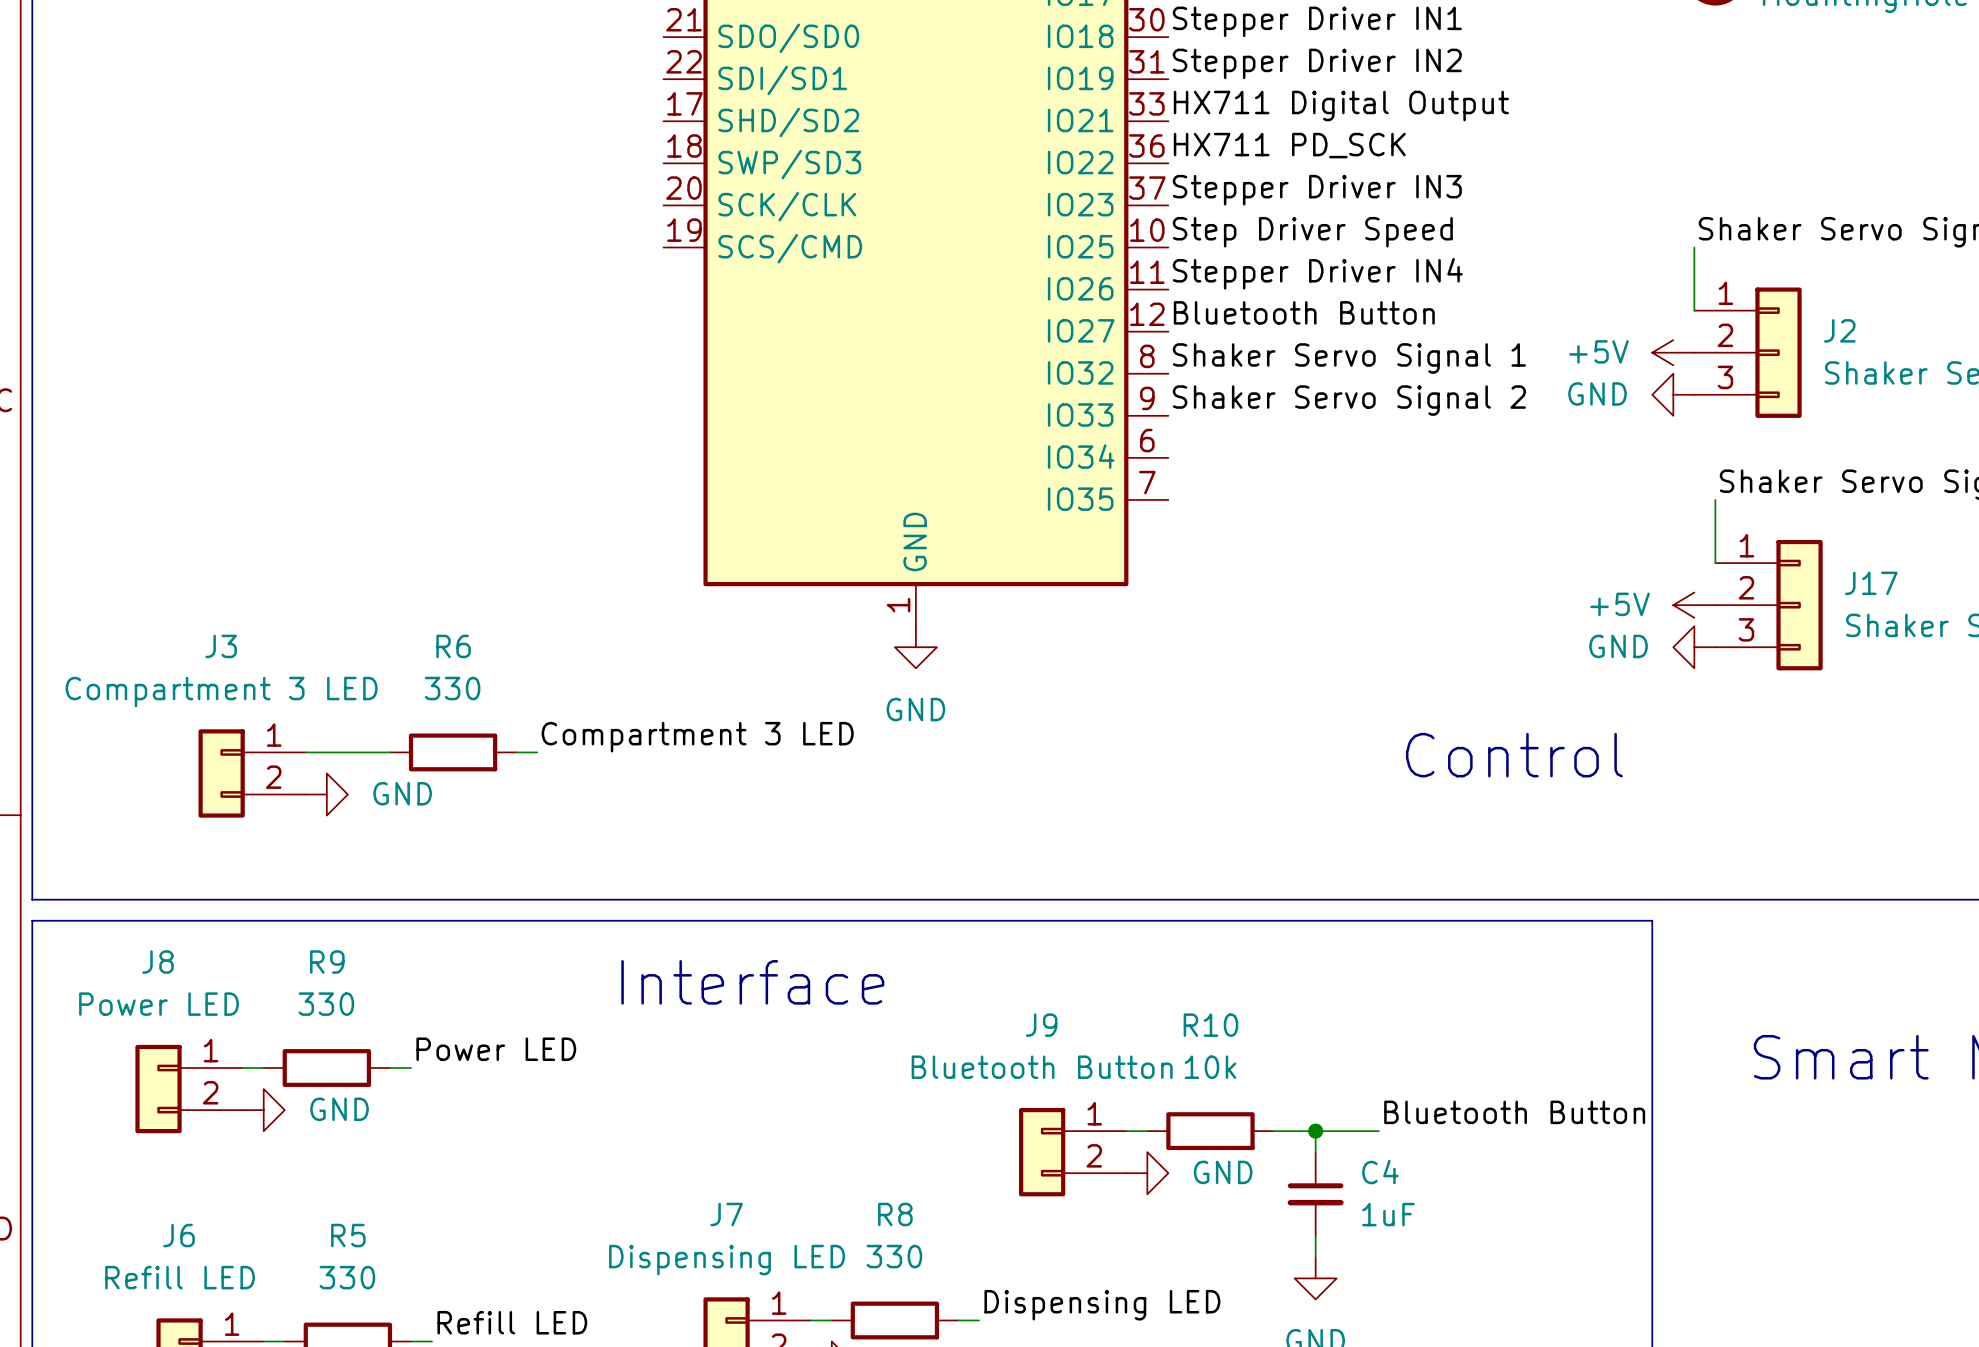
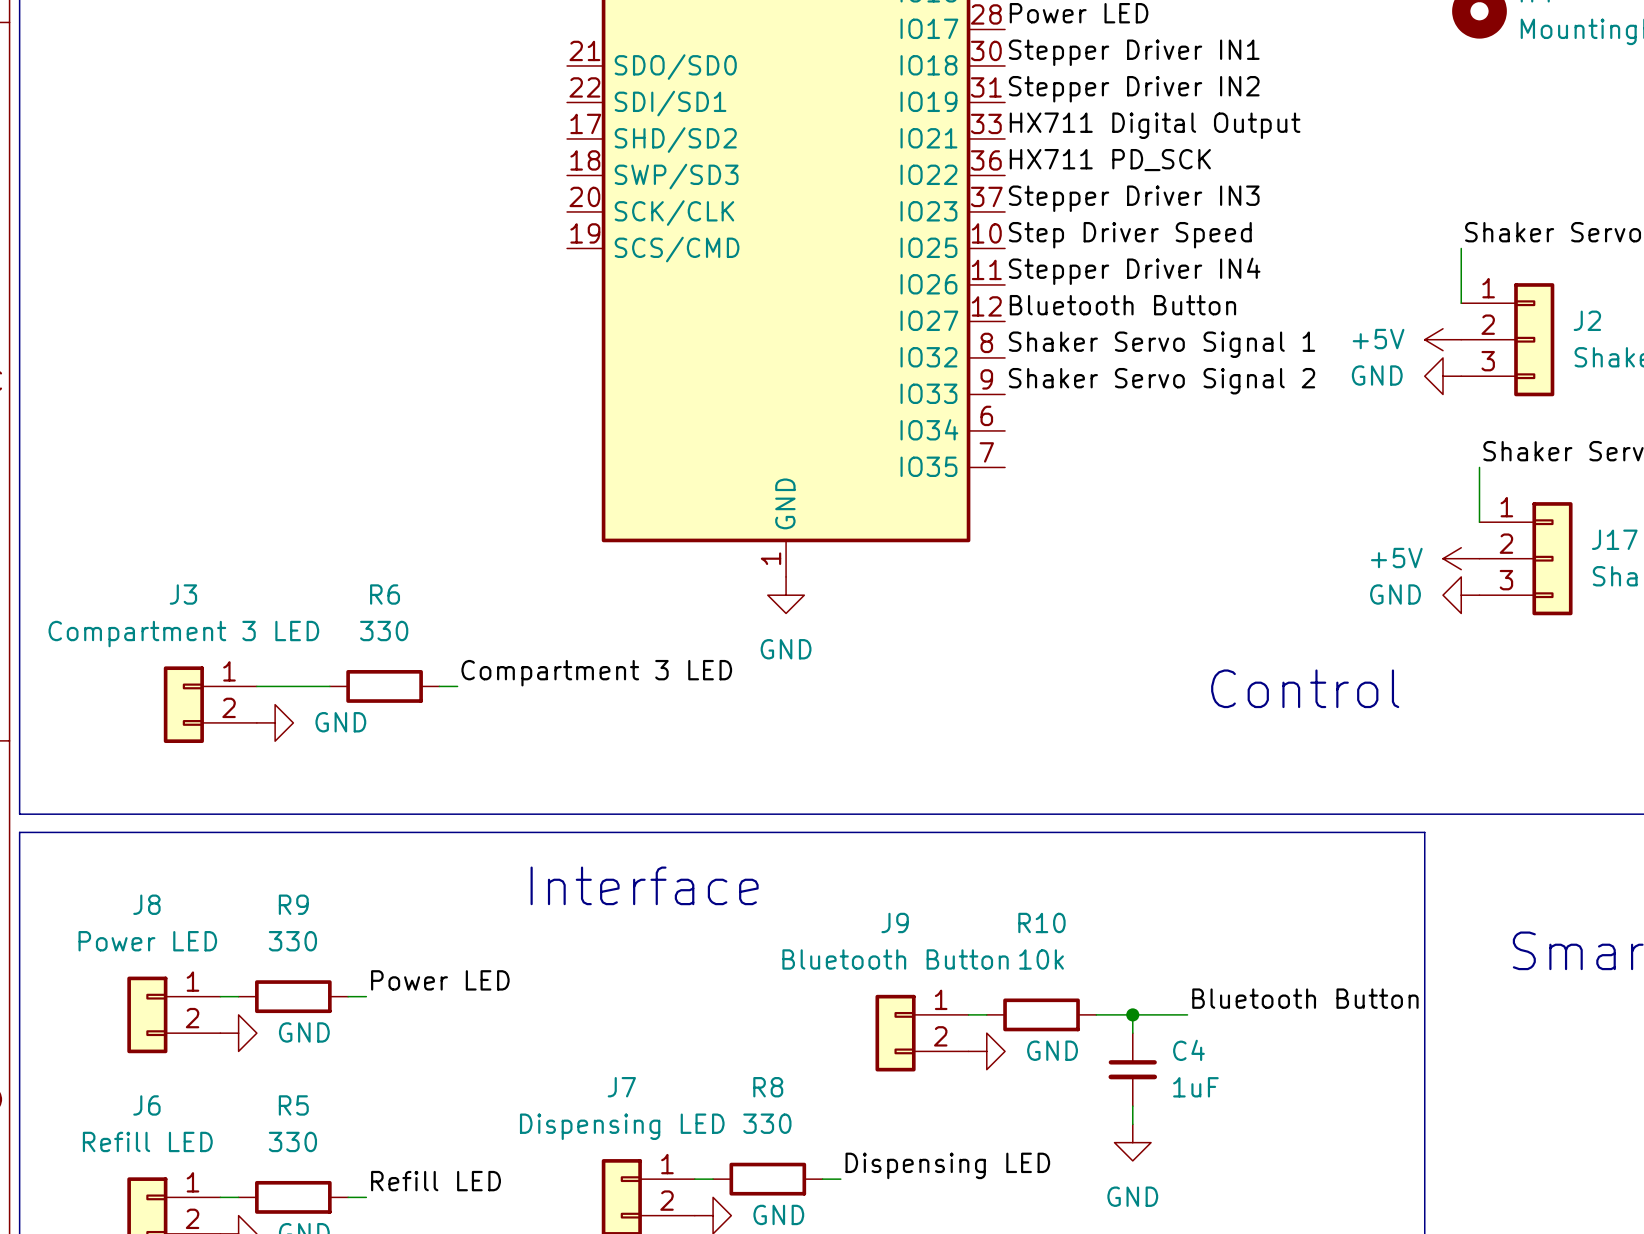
label position: Power LED (496, 1049) -> Power LED (440, 980)
wire: (242, 1068) (263, 1068) -> (220, 996) (238, 996)
R9 position: (326, 1068) -> (293, 996)
wire: (389, 1068) (410, 1068) -> (348, 996) (366, 996)
J8 position: (189, 1089) -> (173, 1014)
power symbol position: GND (263, 1110) -> GND (238, 1033)

